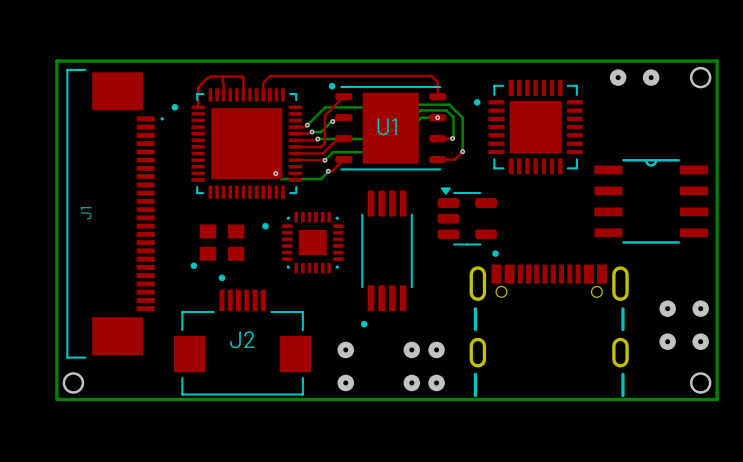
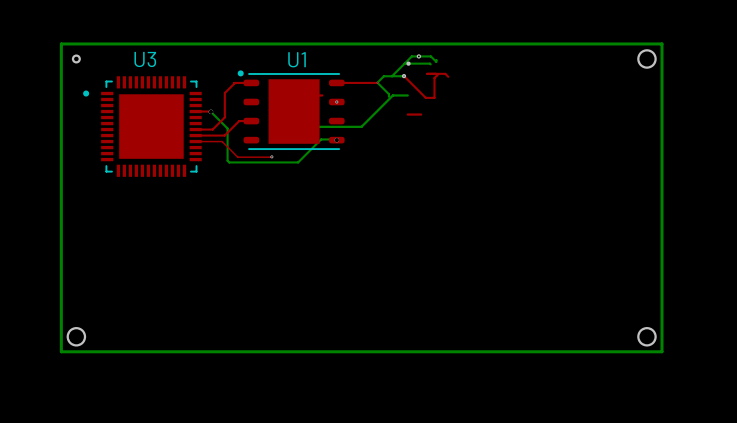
via: none -> (418, 56)
top track: (222, 76) (223, 94) -> none
via: none -> (76, 58)
via: (618, 77) -> none
via: (651, 77) -> none
bottom track: none -> (436, 60) (436, 61) (430, 56) (411, 56) (392, 76)
bottom track: none -> (404, 63) (430, 64)
via: none -> (408, 63)
top track: none -> (427, 73) (445, 73) (448, 76)
top track: none -> (436, 73) (434, 97) (425, 97) (404, 76)
top track: (243, 94) (242, 76) (210, 76) (198, 87) (198, 107) -> none
top track: (263, 94) (263, 83) (270, 76) (431, 76) (437, 82) (437, 96) -> none
top track: (343, 96) (324, 115) (324, 143) (321, 146) (295, 146) -> none
bottom track: none -> (403, 76) (383, 76) (377, 82) (389, 94) (389, 96)
via: none -> (404, 76)
top track: none -> (234, 82) (251, 82) (244, 82)
top track: none -> (234, 83) (224, 93) (224, 117) (212, 129) (195, 129)
top track: none -> (377, 82) (336, 82)
via: none -> (377, 82)
bottom track: (455, 111) (449, 104) (418, 104) (415, 107) (325, 107) (307, 125) -> none
bottom track: (455, 111) (462, 117) (462, 151) -> none
via: (437, 117) -> none
bottom track: (331, 121) (321, 132) (312, 132) -> none
via: (332, 121) -> none
via: none -> (336, 102)
via: (307, 125) -> none
U1 position: (387, 126) -> (291, 110)
U1 name position: U1 (387, 126) -> U1 (297, 59)
part: (528, 127) -> none
via: (312, 132) -> none
top track: (308, 133) (295, 133) -> none
top track: none -> (195, 111) (210, 111)
bottom track: none -> (210, 111) (227, 128) (227, 160) (229, 162) (298, 162) (321, 139) (336, 140)
via: none -> (210, 111)
top track: (343, 138) (337, 138) (322, 153) (295, 153) -> none
bottom track: (452, 138) (453, 116) (446, 110) (420, 110) (391, 139) (317, 139) -> none
via: (452, 138) -> none
top track: (317, 139) (295, 140) -> none
via: (317, 139) -> none
part: (236, 143) -> none
top track: none -> (251, 121) (239, 121) (224, 135) (195, 135)
U3: none -> (142, 126)
top track: (462, 151) (454, 159) (437, 159) -> none
via: (462, 151) -> none
top track: (343, 159) (332, 171) (328, 171) -> none
top track: (295, 160) (324, 160) -> none
via: (324, 160) -> none
via: none -> (336, 140)
top track: none -> (195, 141) (222, 141) (237, 157) (271, 156)
bottom track: (328, 171) (321, 179) (281, 179) (275, 173) -> none
via: (328, 171) -> none
via: (275, 173) -> none
via: none -> (271, 156)
part: (651, 201) -> none
J1: (115, 213) -> none
part: (467, 216) -> none
part: (302, 242) -> none
part: (217, 246) -> none
part: (386, 259) -> none
via: (667, 308) -> none
via: (700, 308) -> none
part: (549, 323) -> none
J2: (242, 335) -> none
via: (667, 341) -> none
via: (700, 341) -> none
via: (345, 349) -> none
via: (411, 349) -> none
via: (436, 349) -> none
via: (345, 382) -> none
via: (411, 382) -> none
via: (436, 382) -> none

